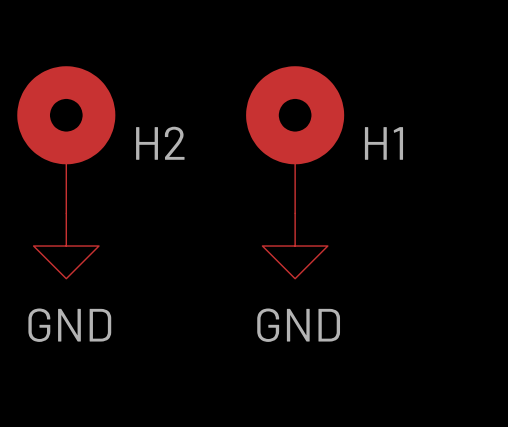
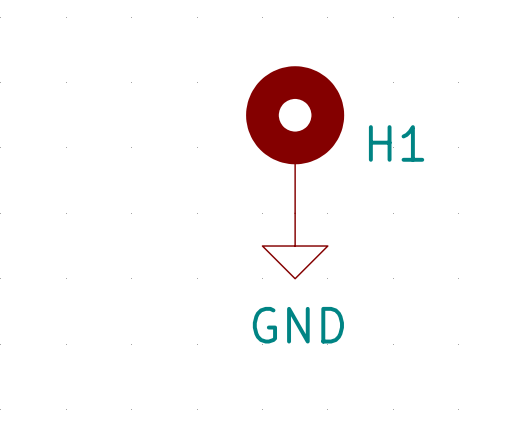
H2: (66, 139) -> none
power symbol: GND (66, 246) -> none

